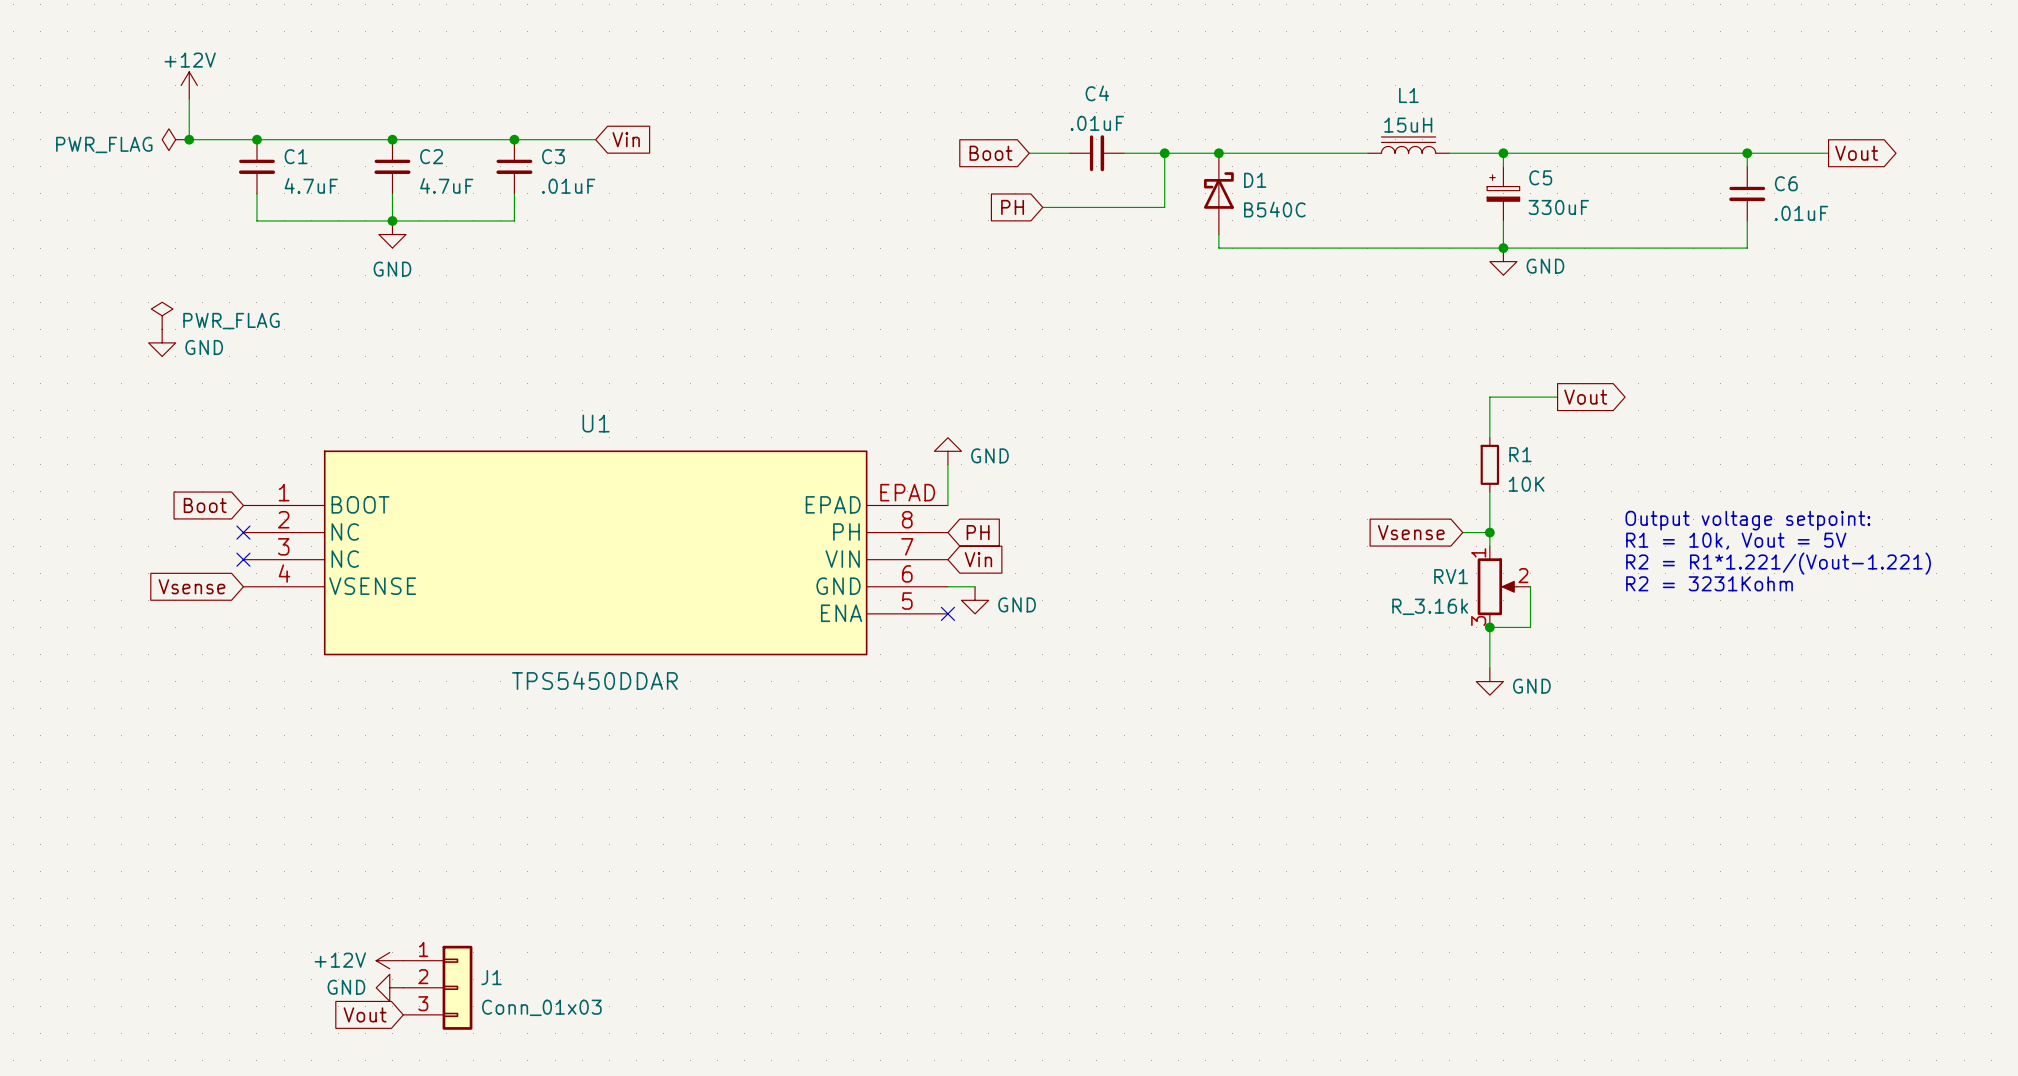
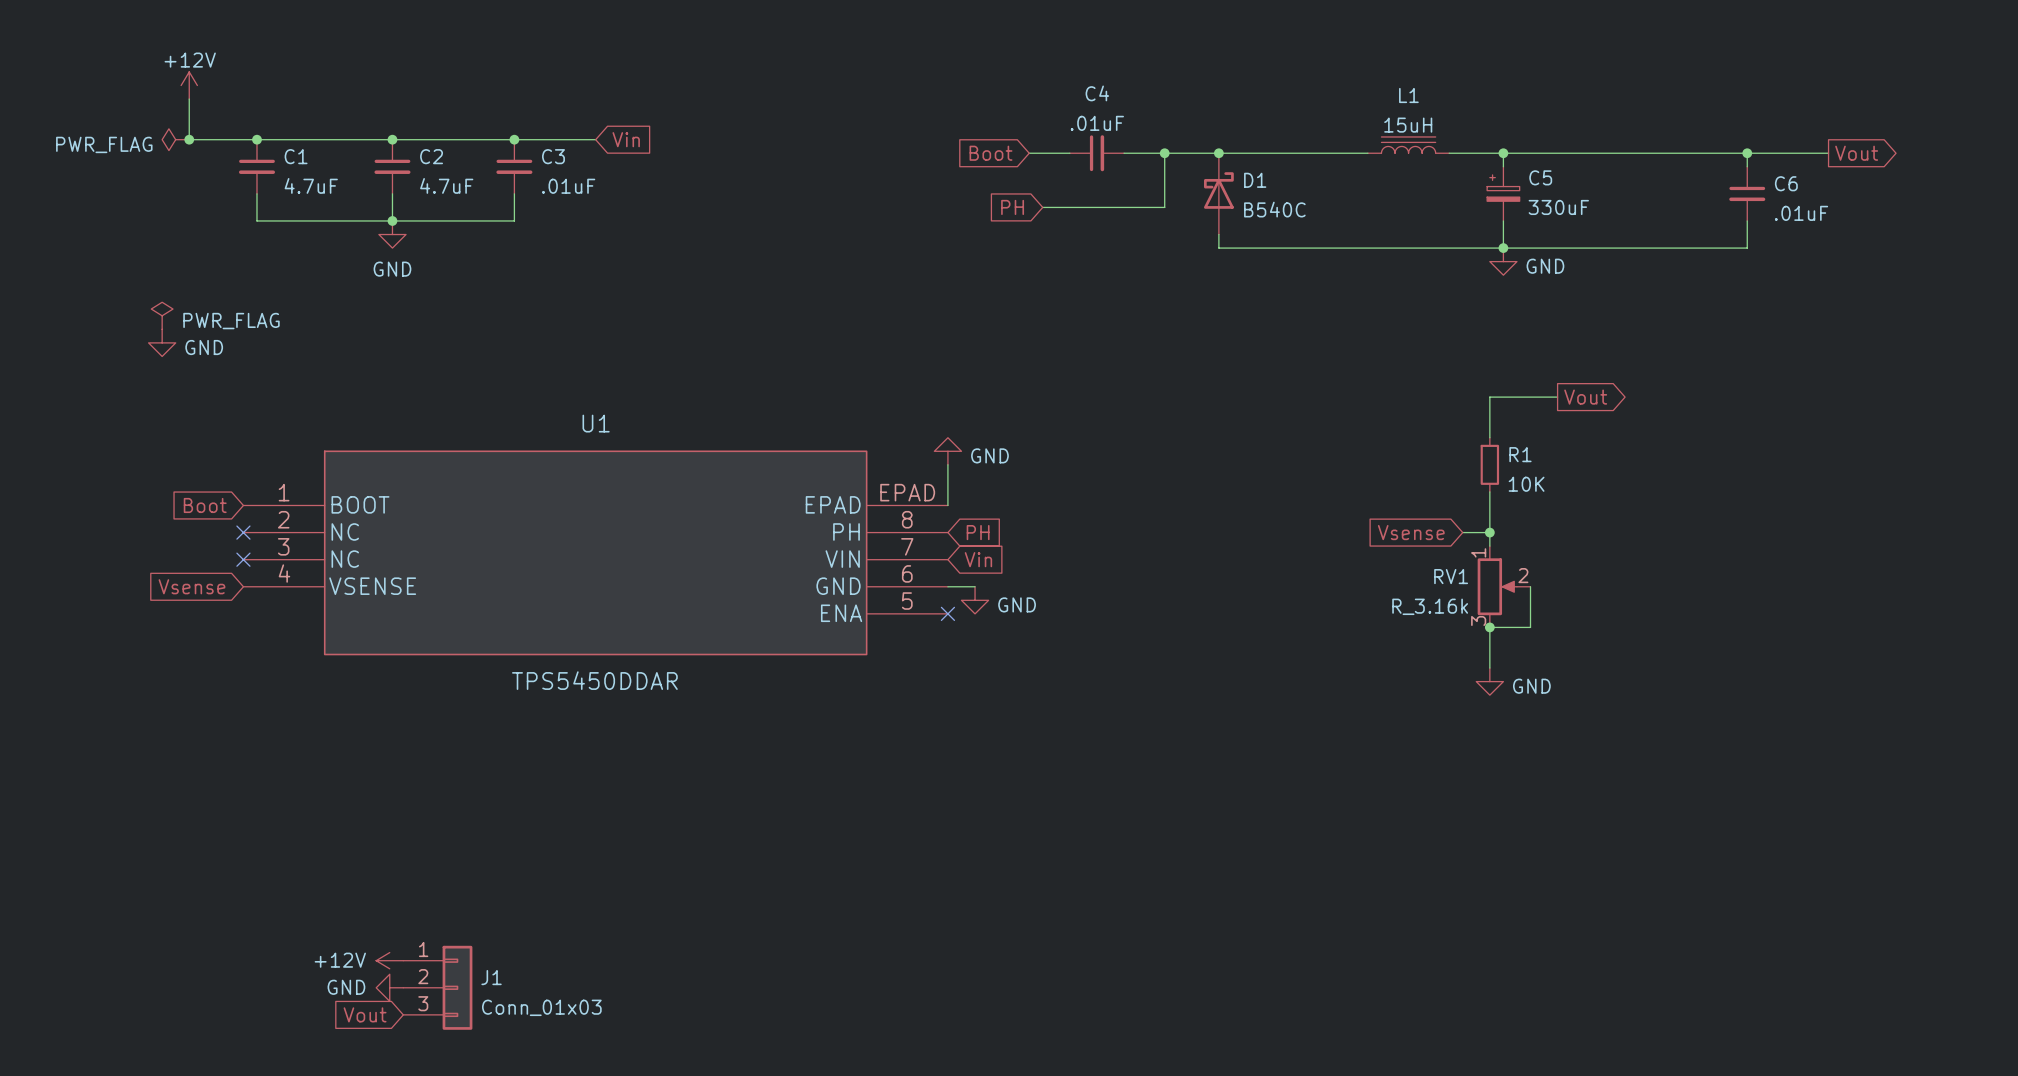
text: Output voltage setpoint: (1747, 520) -> none
text: R1 = 10k, Vout = 5V (1736, 541) -> none
text: R2 = R1*1.221/(Vout-1.221) (1778, 563) -> none
text: R2 = 3231Kohm (1709, 583) -> none

